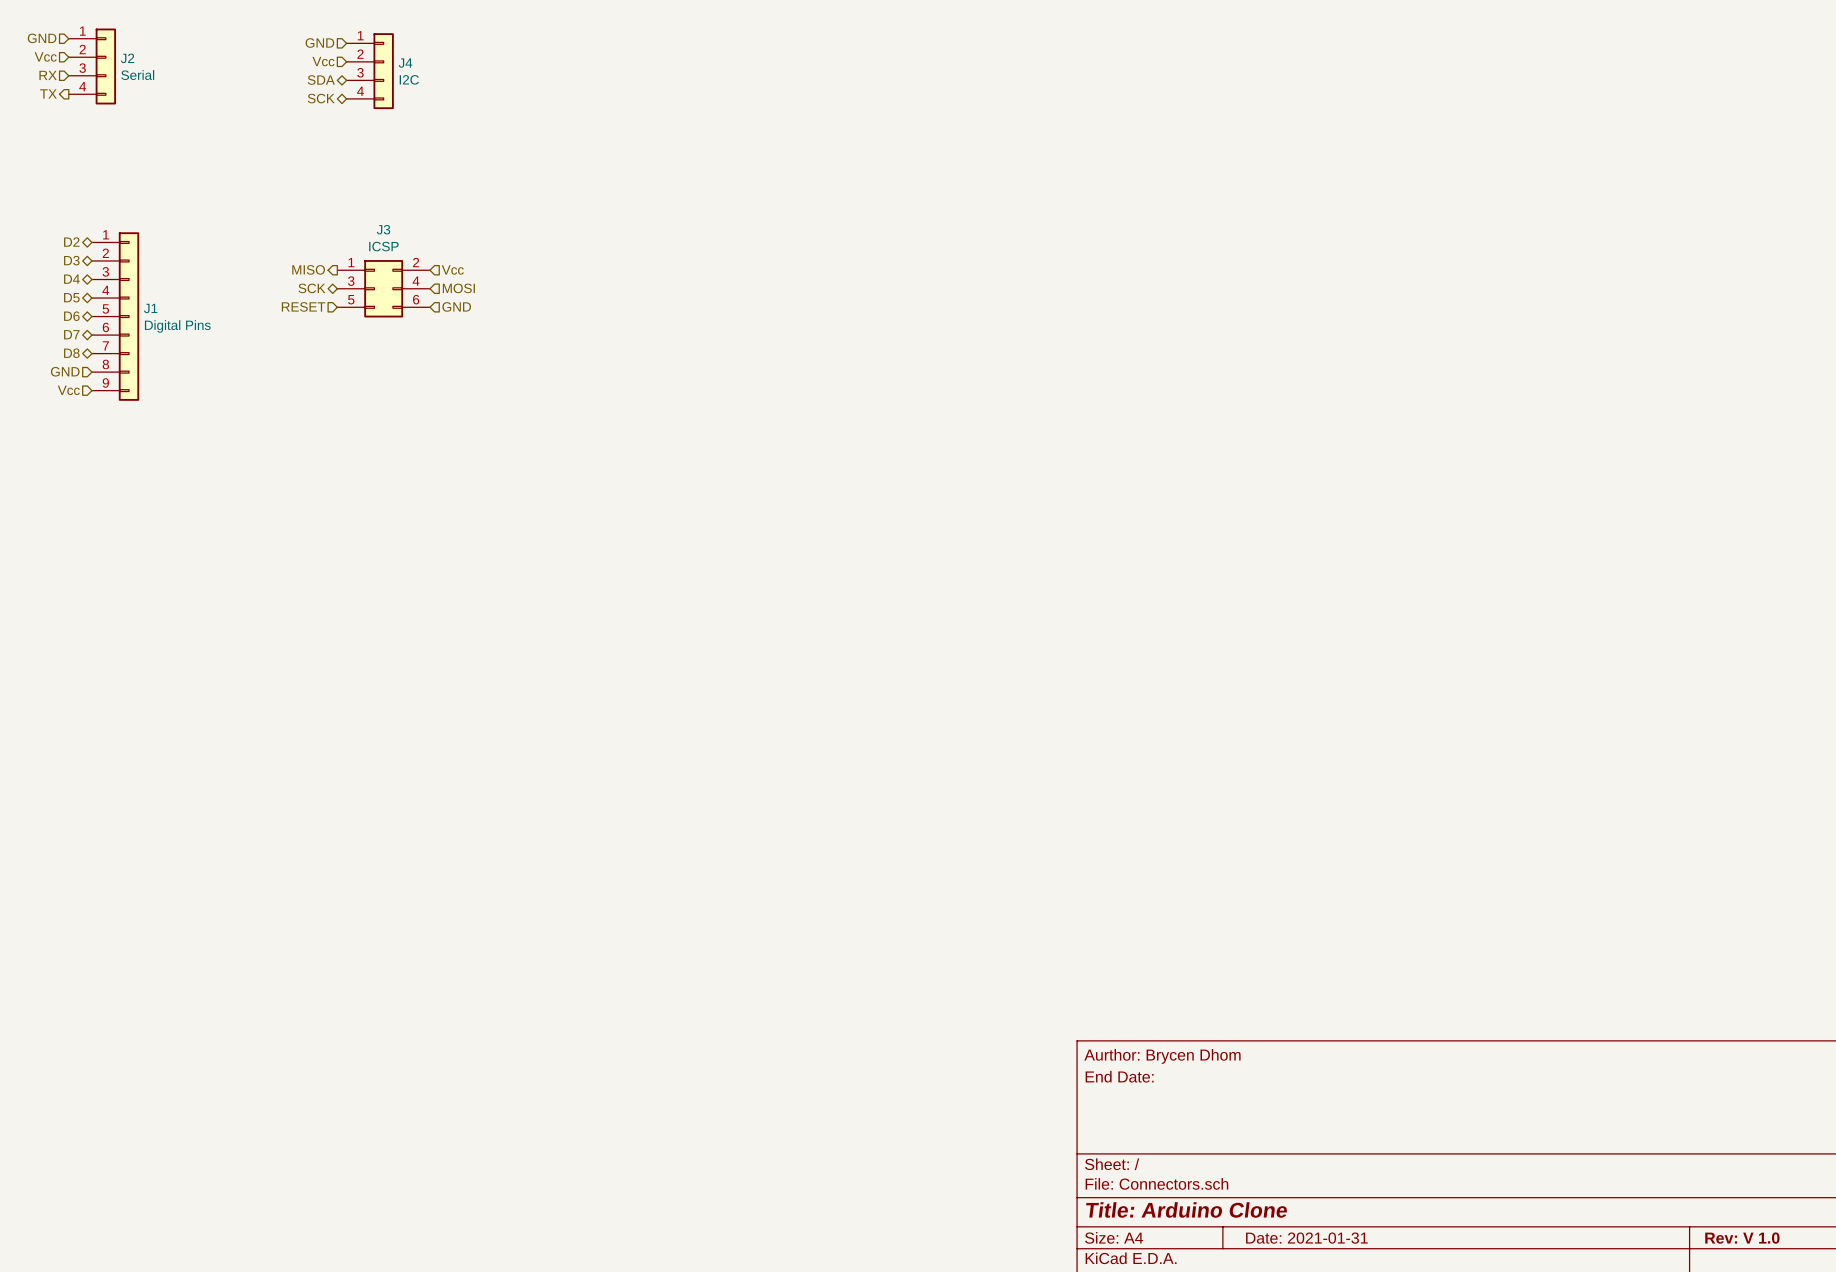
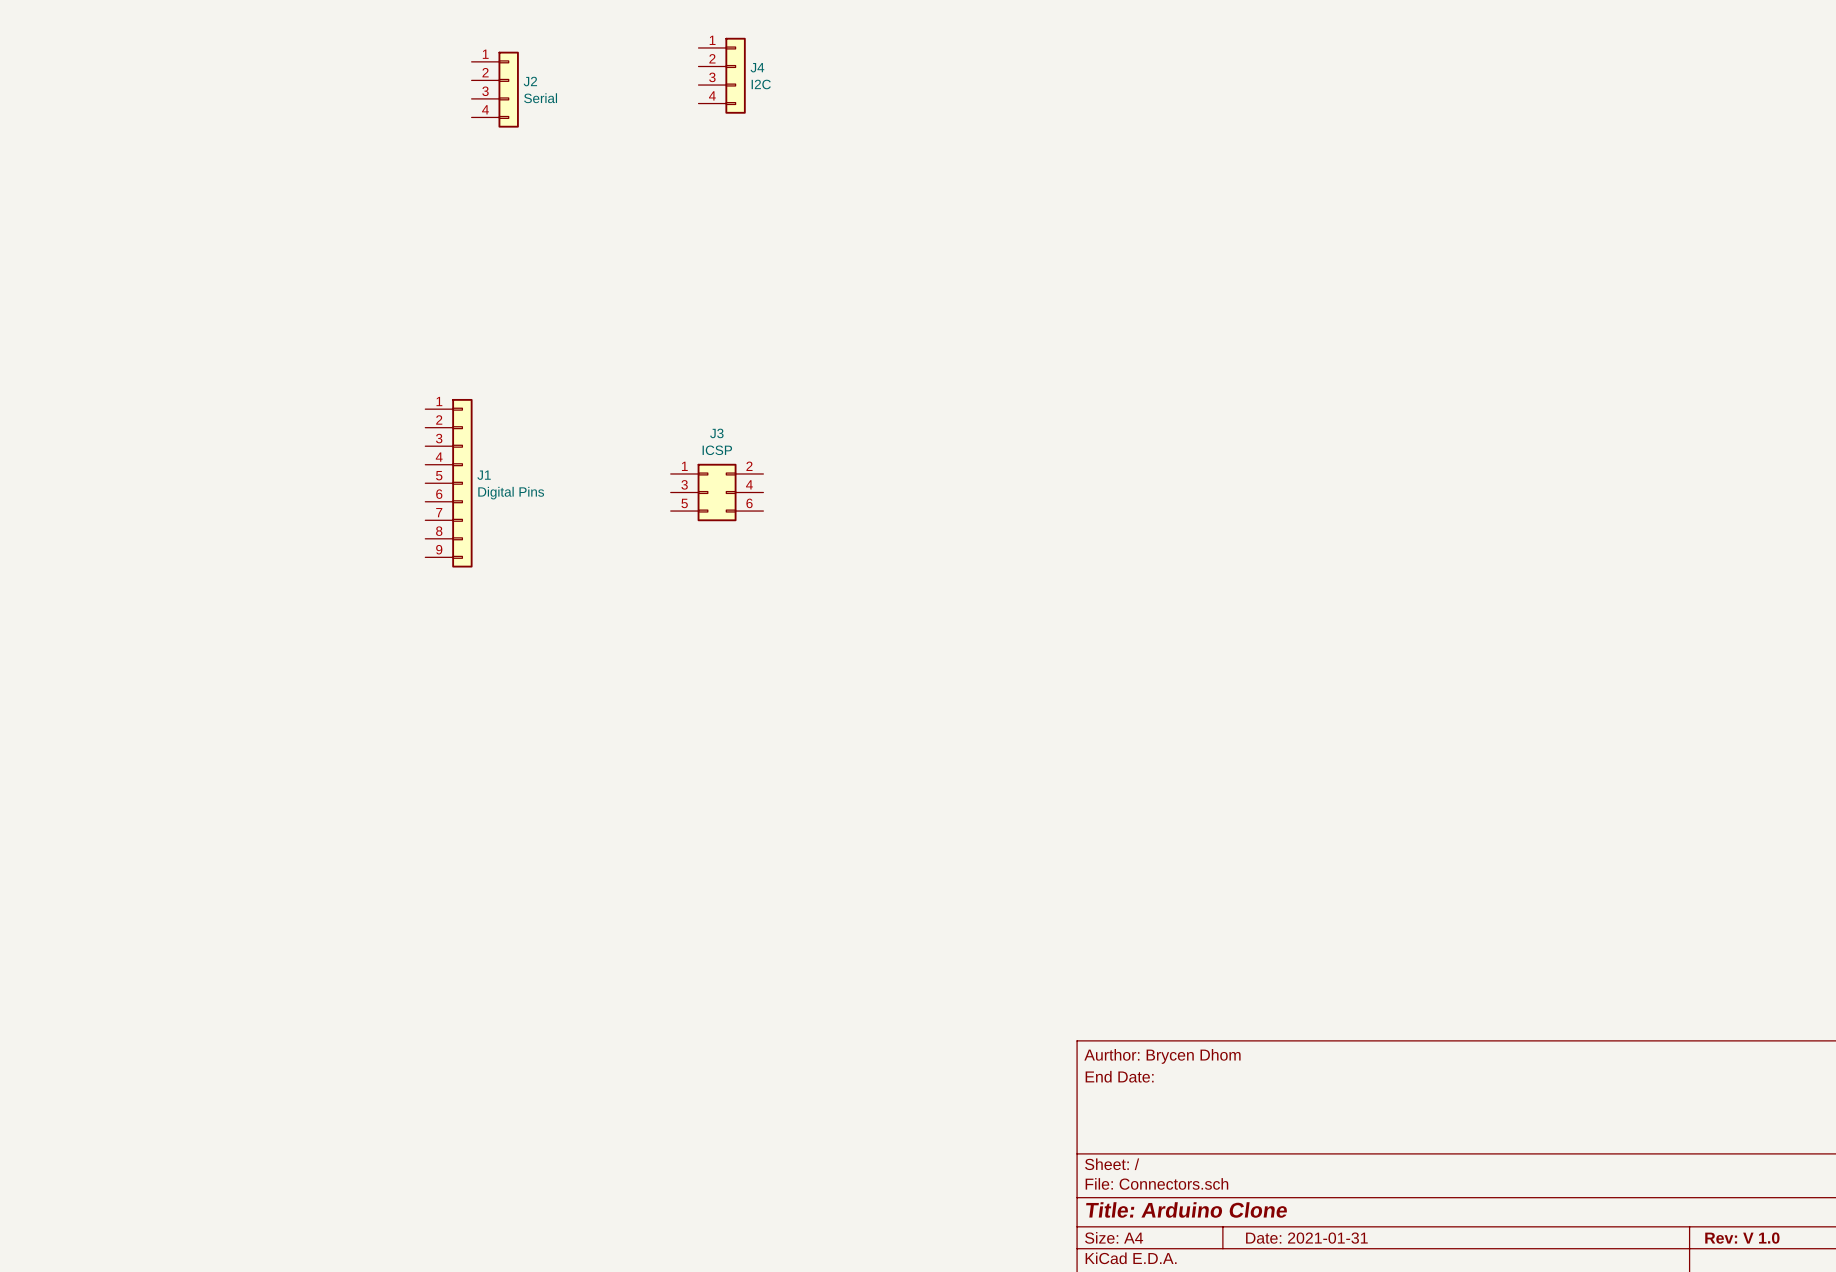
hierarchical label: GND (42, 38) -> none
hierarchical label: GND (319, 43) -> none
hierarchical label: Vcc (45, 56) -> none
hierarchical label: Vcc (323, 61) -> none
J2 position: (92, 66) -> (495, 89)
J4 position: (370, 71) -> (722, 75)
hierarchical label: RX (48, 75) -> none
hierarchical label: SDA (321, 80) -> none
hierarchical label: TX (48, 93) -> none
hierarchical label: SCK (321, 98) -> none
hierarchical label: D2 (71, 242) -> none
hierarchical label: D3 (71, 260) -> none
hierarchical label: MISO (308, 269) -> none
hierarchical label: Vcc (452, 269) -> none
hierarchical label: D4 (71, 279) -> none
hierarchical label: SCK (311, 288) -> none
J3 position: (383, 288) -> (717, 492)
hierarchical label: MOSI (458, 288) -> none
hierarchical label: D5 (71, 297) -> none
hierarchical label: RESET (303, 306) -> none
hierarchical label: GND (456, 306) -> none
hierarchical label: D6 (71, 316) -> none
J1 position: (115, 316) -> (448, 483)
hierarchical label: D7 (71, 334) -> none
hierarchical label: D8 (71, 353) -> none
hierarchical label: GND (65, 371) -> none
hierarchical label: Vcc (68, 390) -> none

